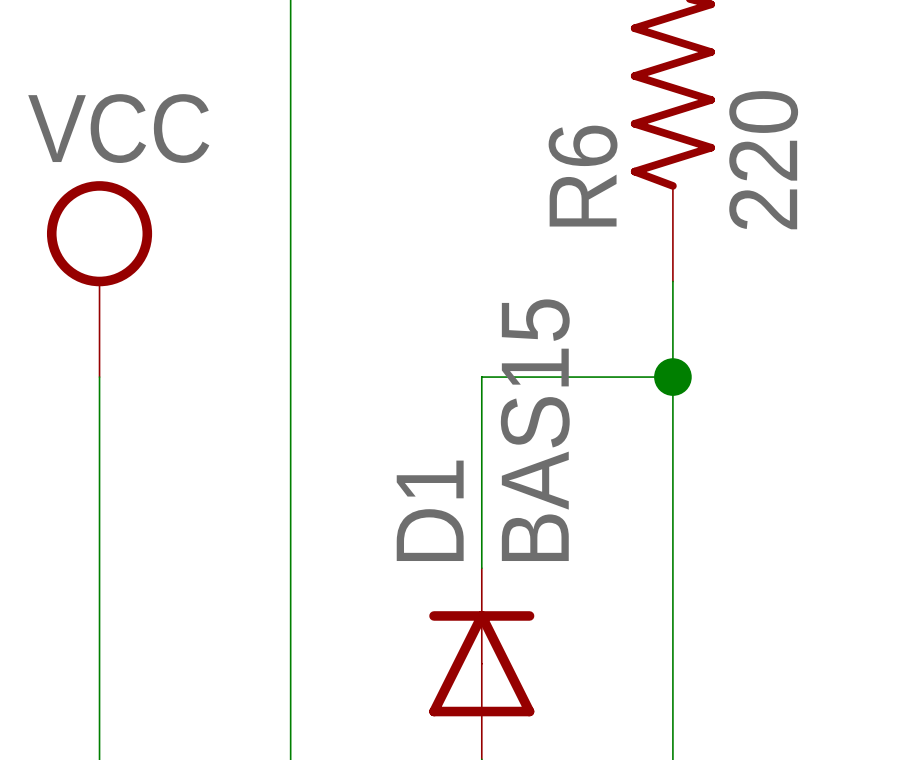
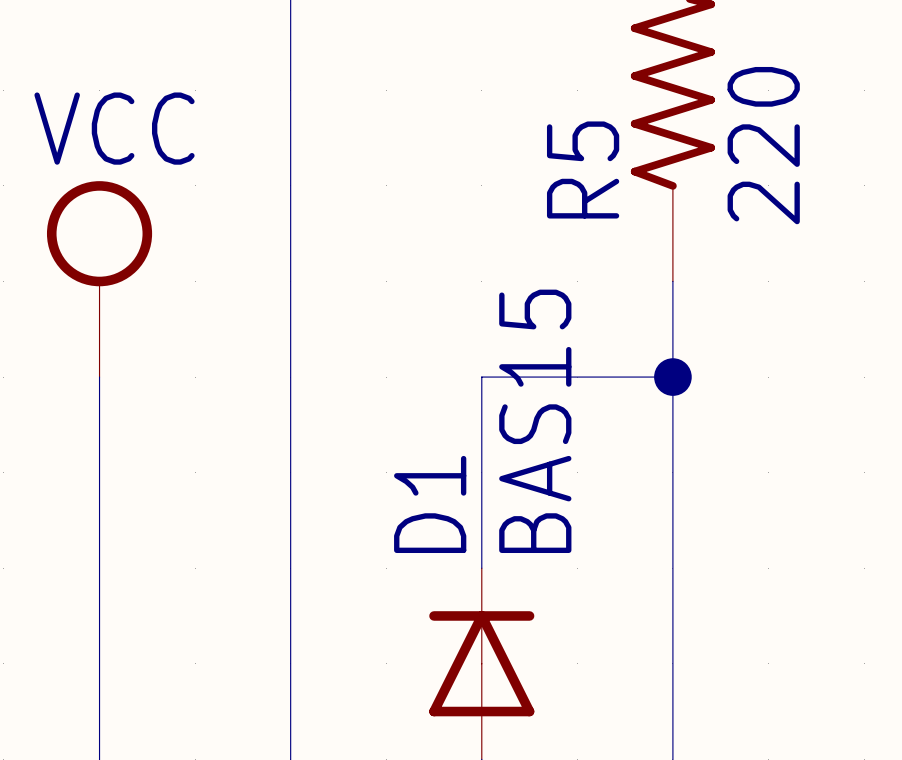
R6 name: R6 (583, 176) -> R5 (583, 169)

